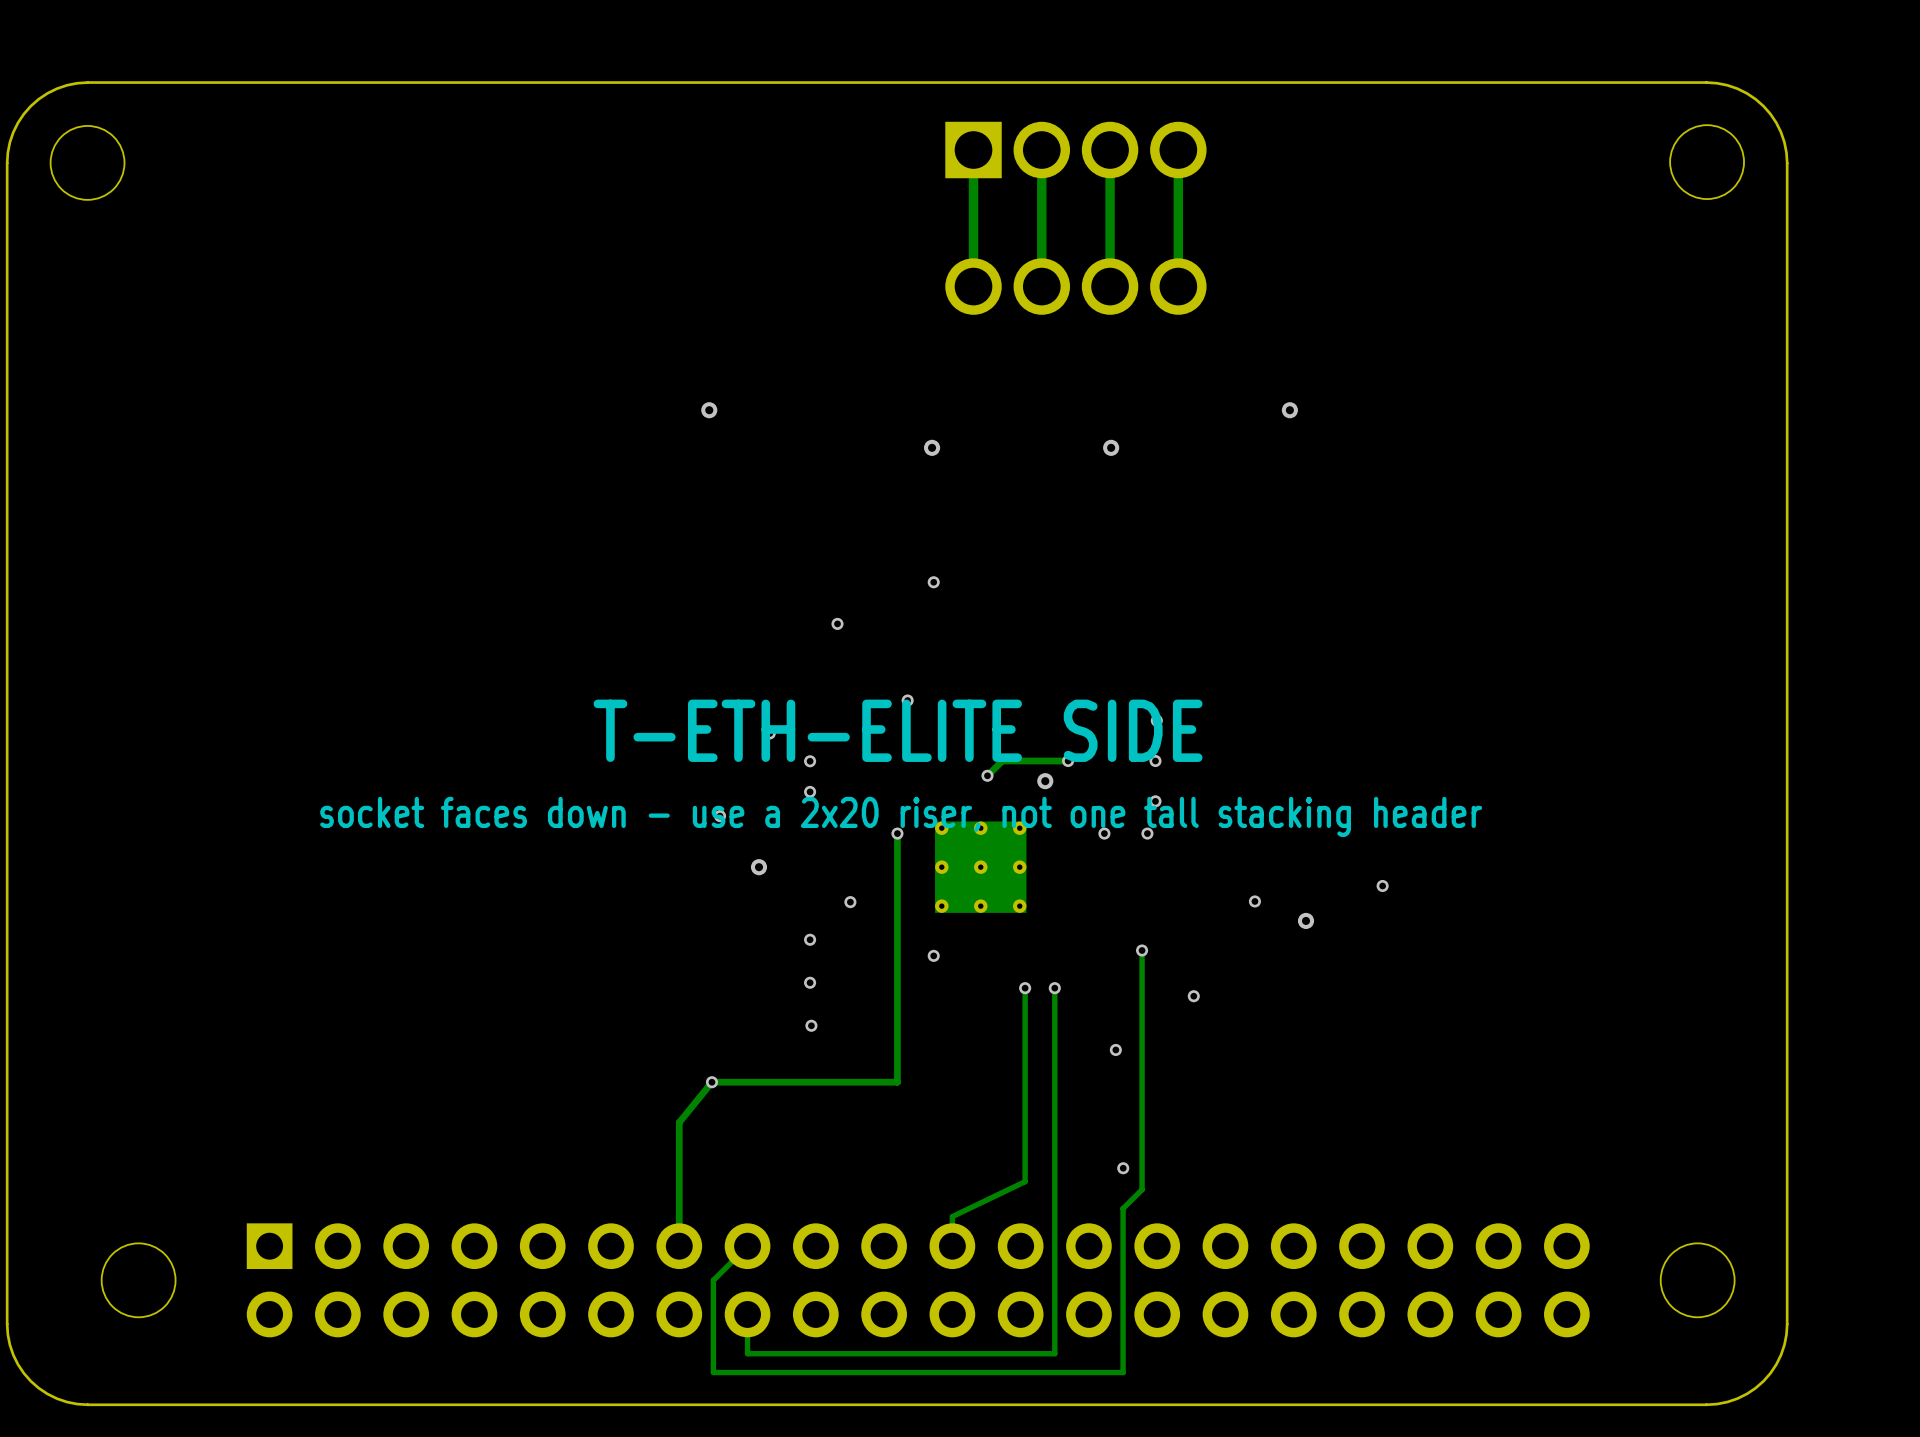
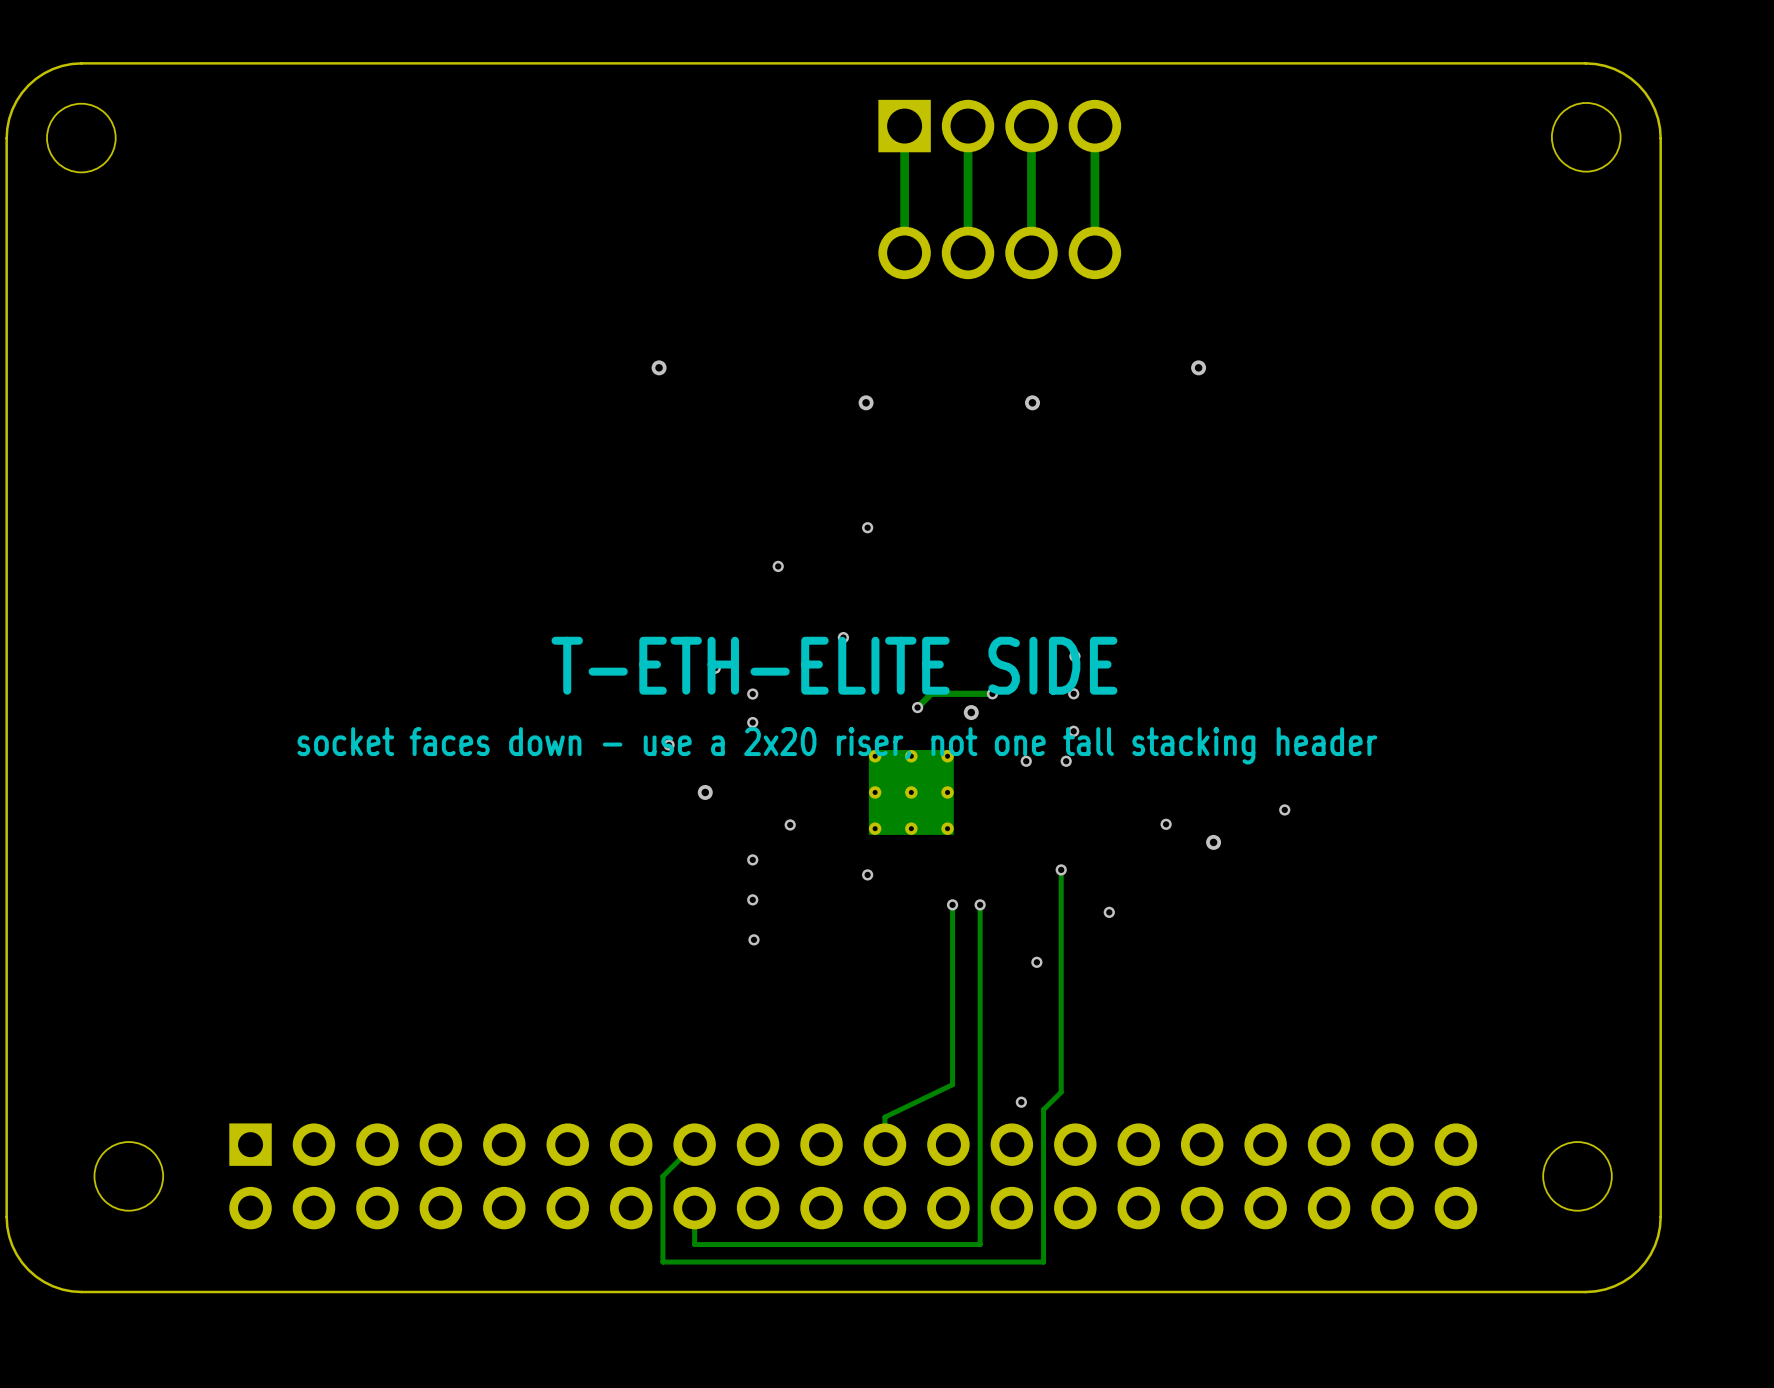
track: (897, 833) (897, 1082) (711, 1082) (679, 1122) (679, 1246) -> none
via: (897, 833) -> none
via: (711, 1082) -> none
via position: (1123, 1168) -> (1021, 1102)

